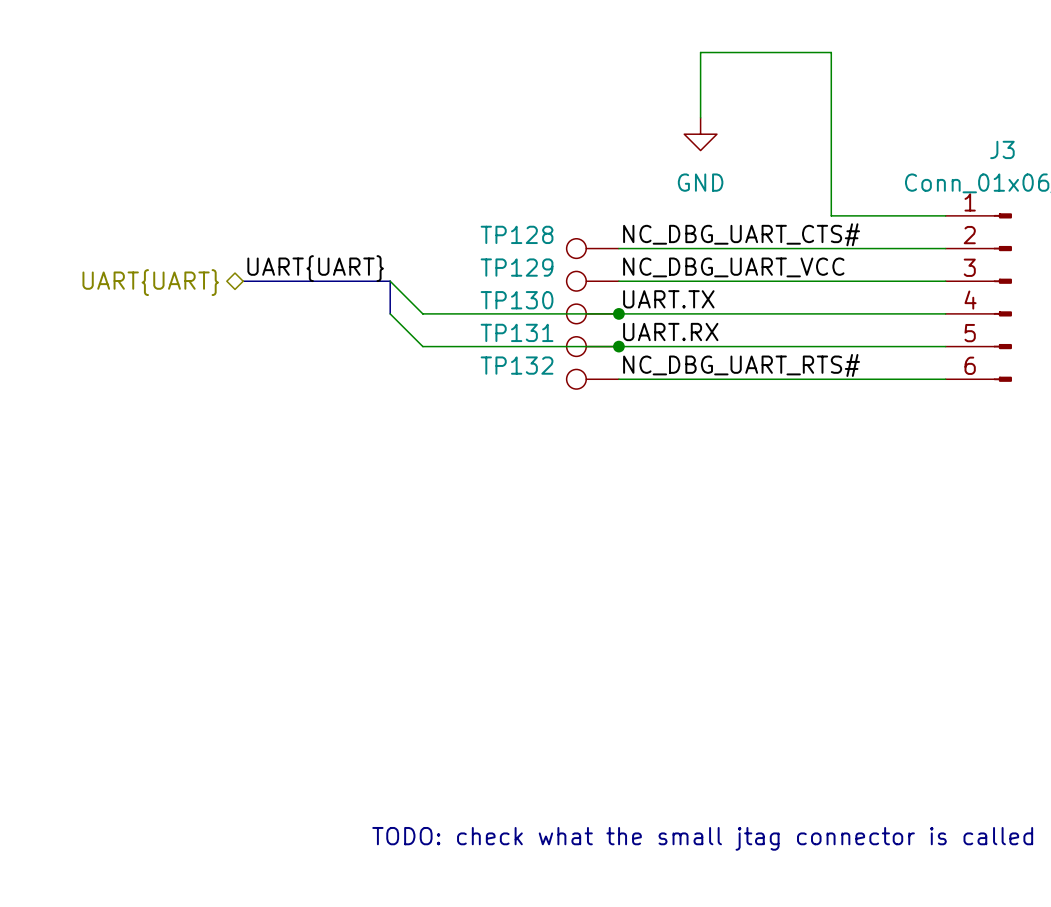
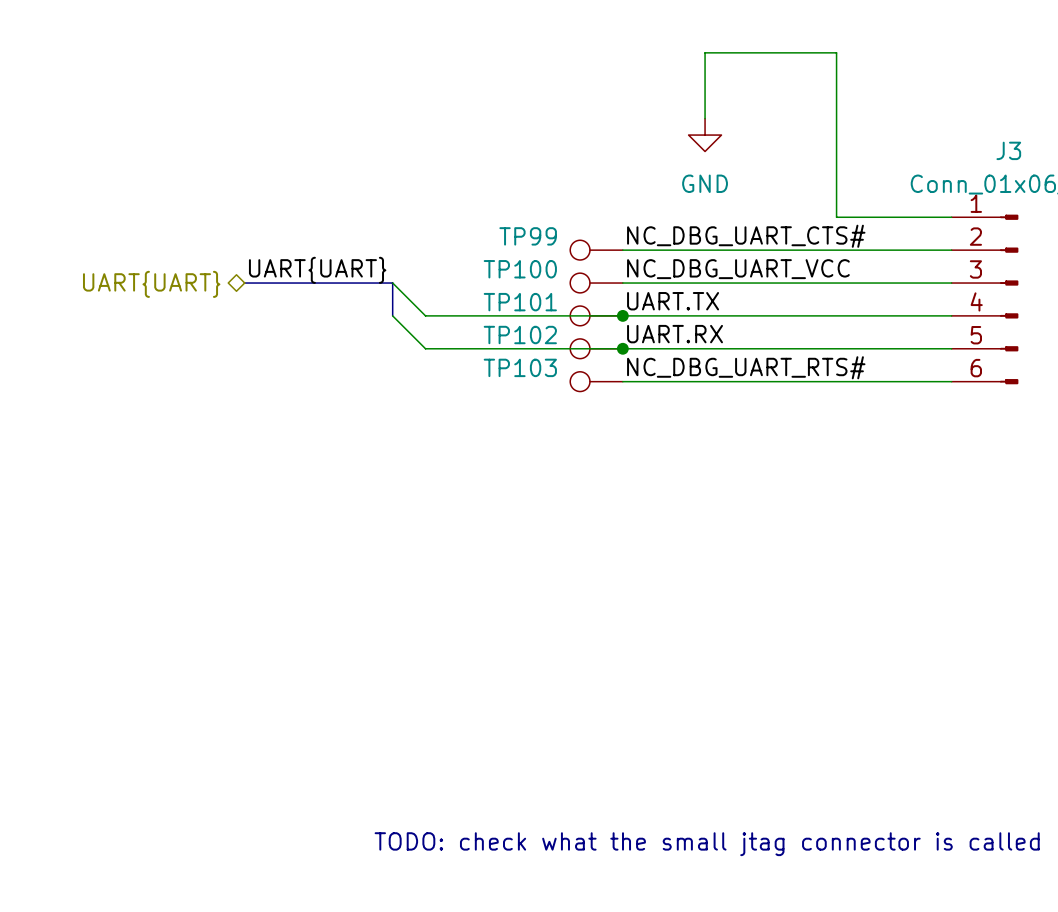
TP128 name: TP128 (517, 234) -> TP99 (528, 236)
TP129 name: TP129 (517, 267) -> TP100 (520, 269)
TP130 name: TP130 (517, 300) -> TP101 (520, 302)
TP131 name: TP131 (517, 332) -> TP102 (520, 335)
TP132 name: TP132 (517, 365) -> TP103 (520, 367)

